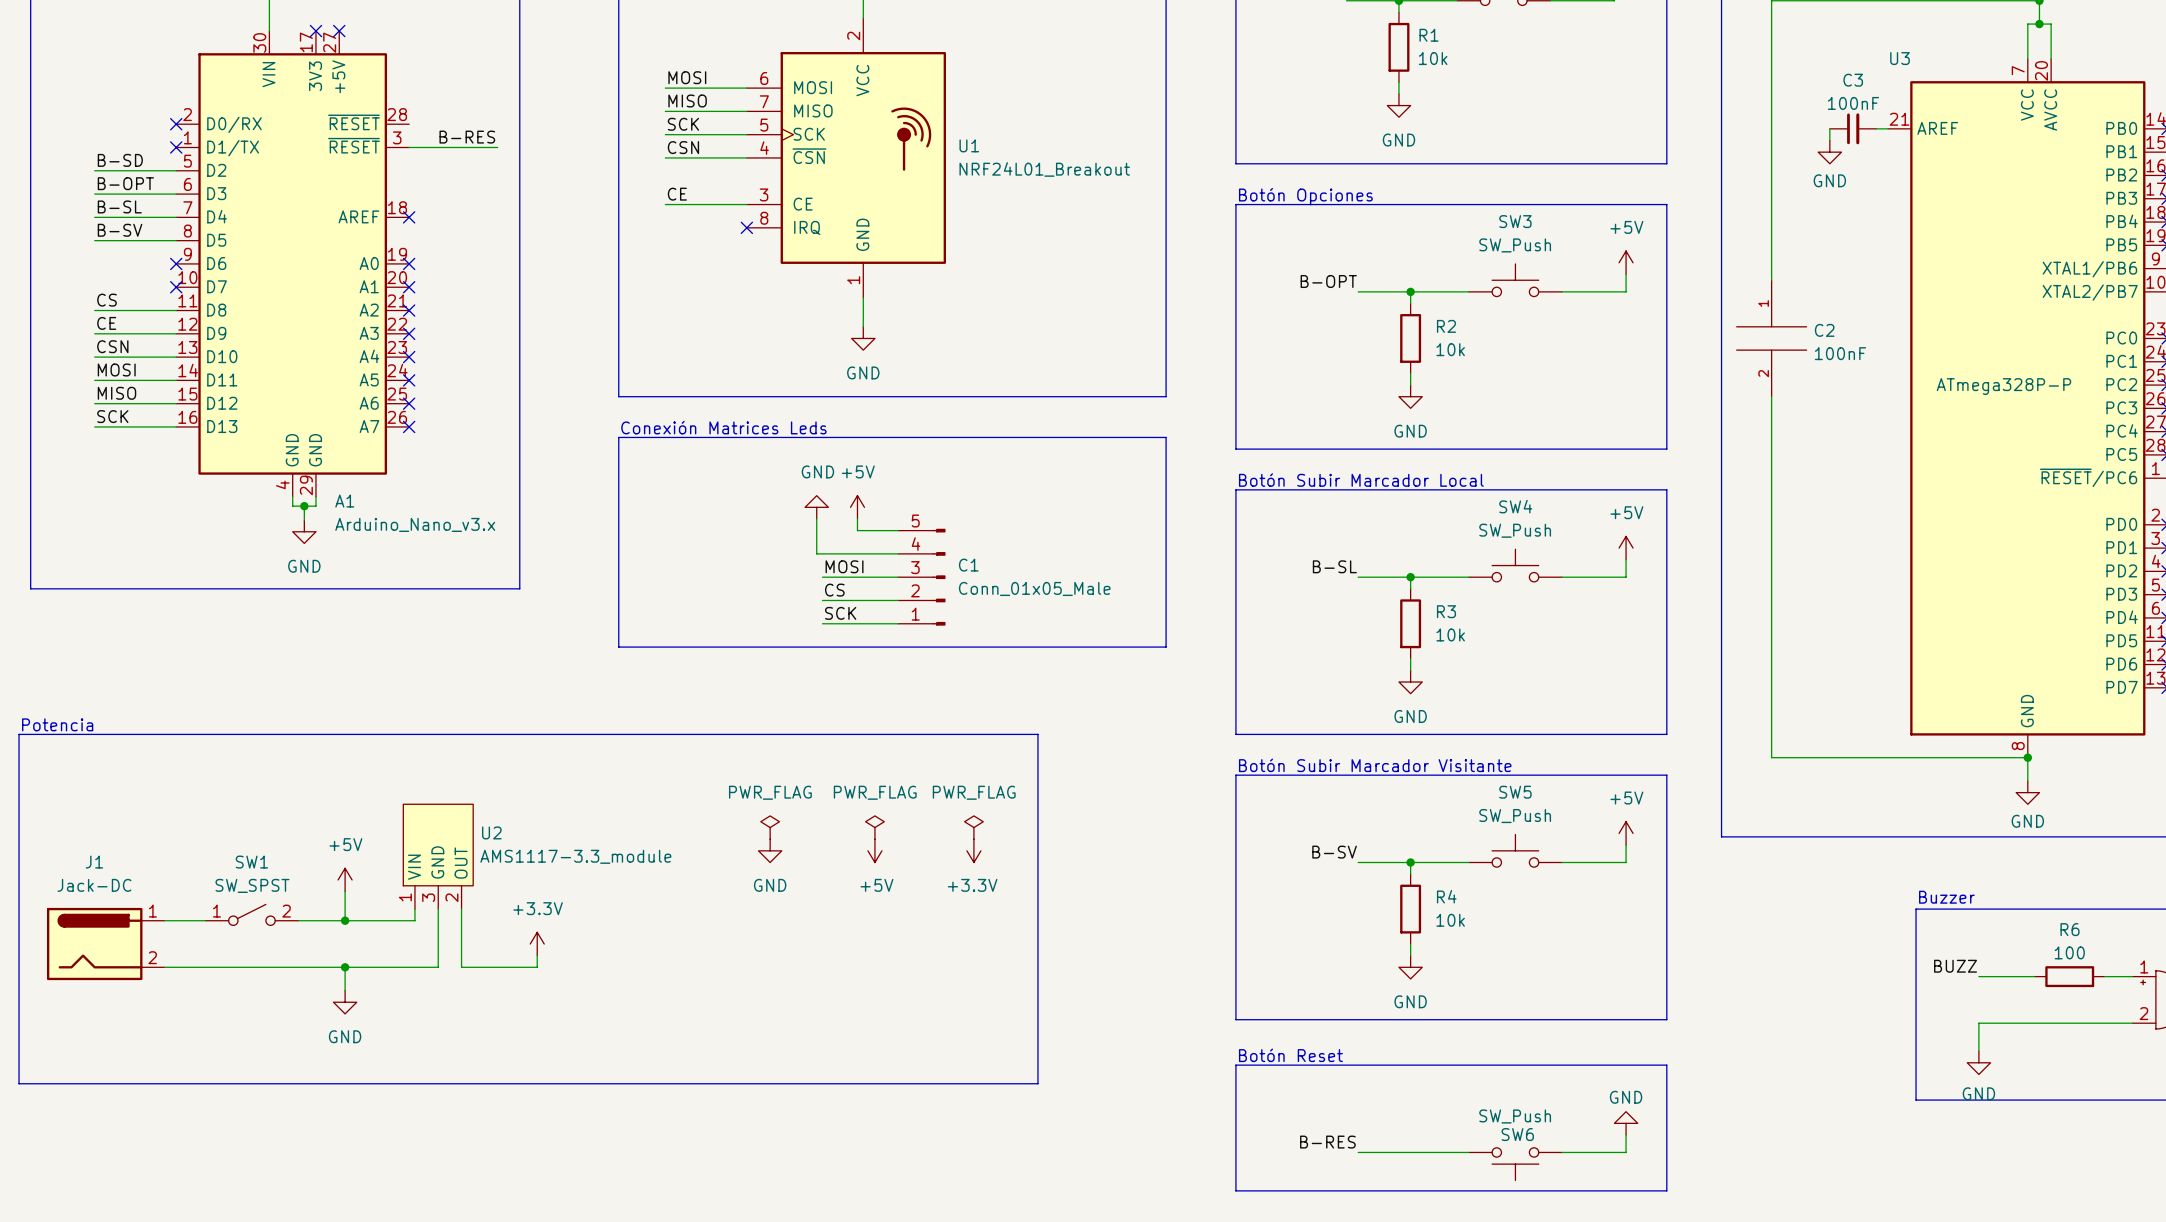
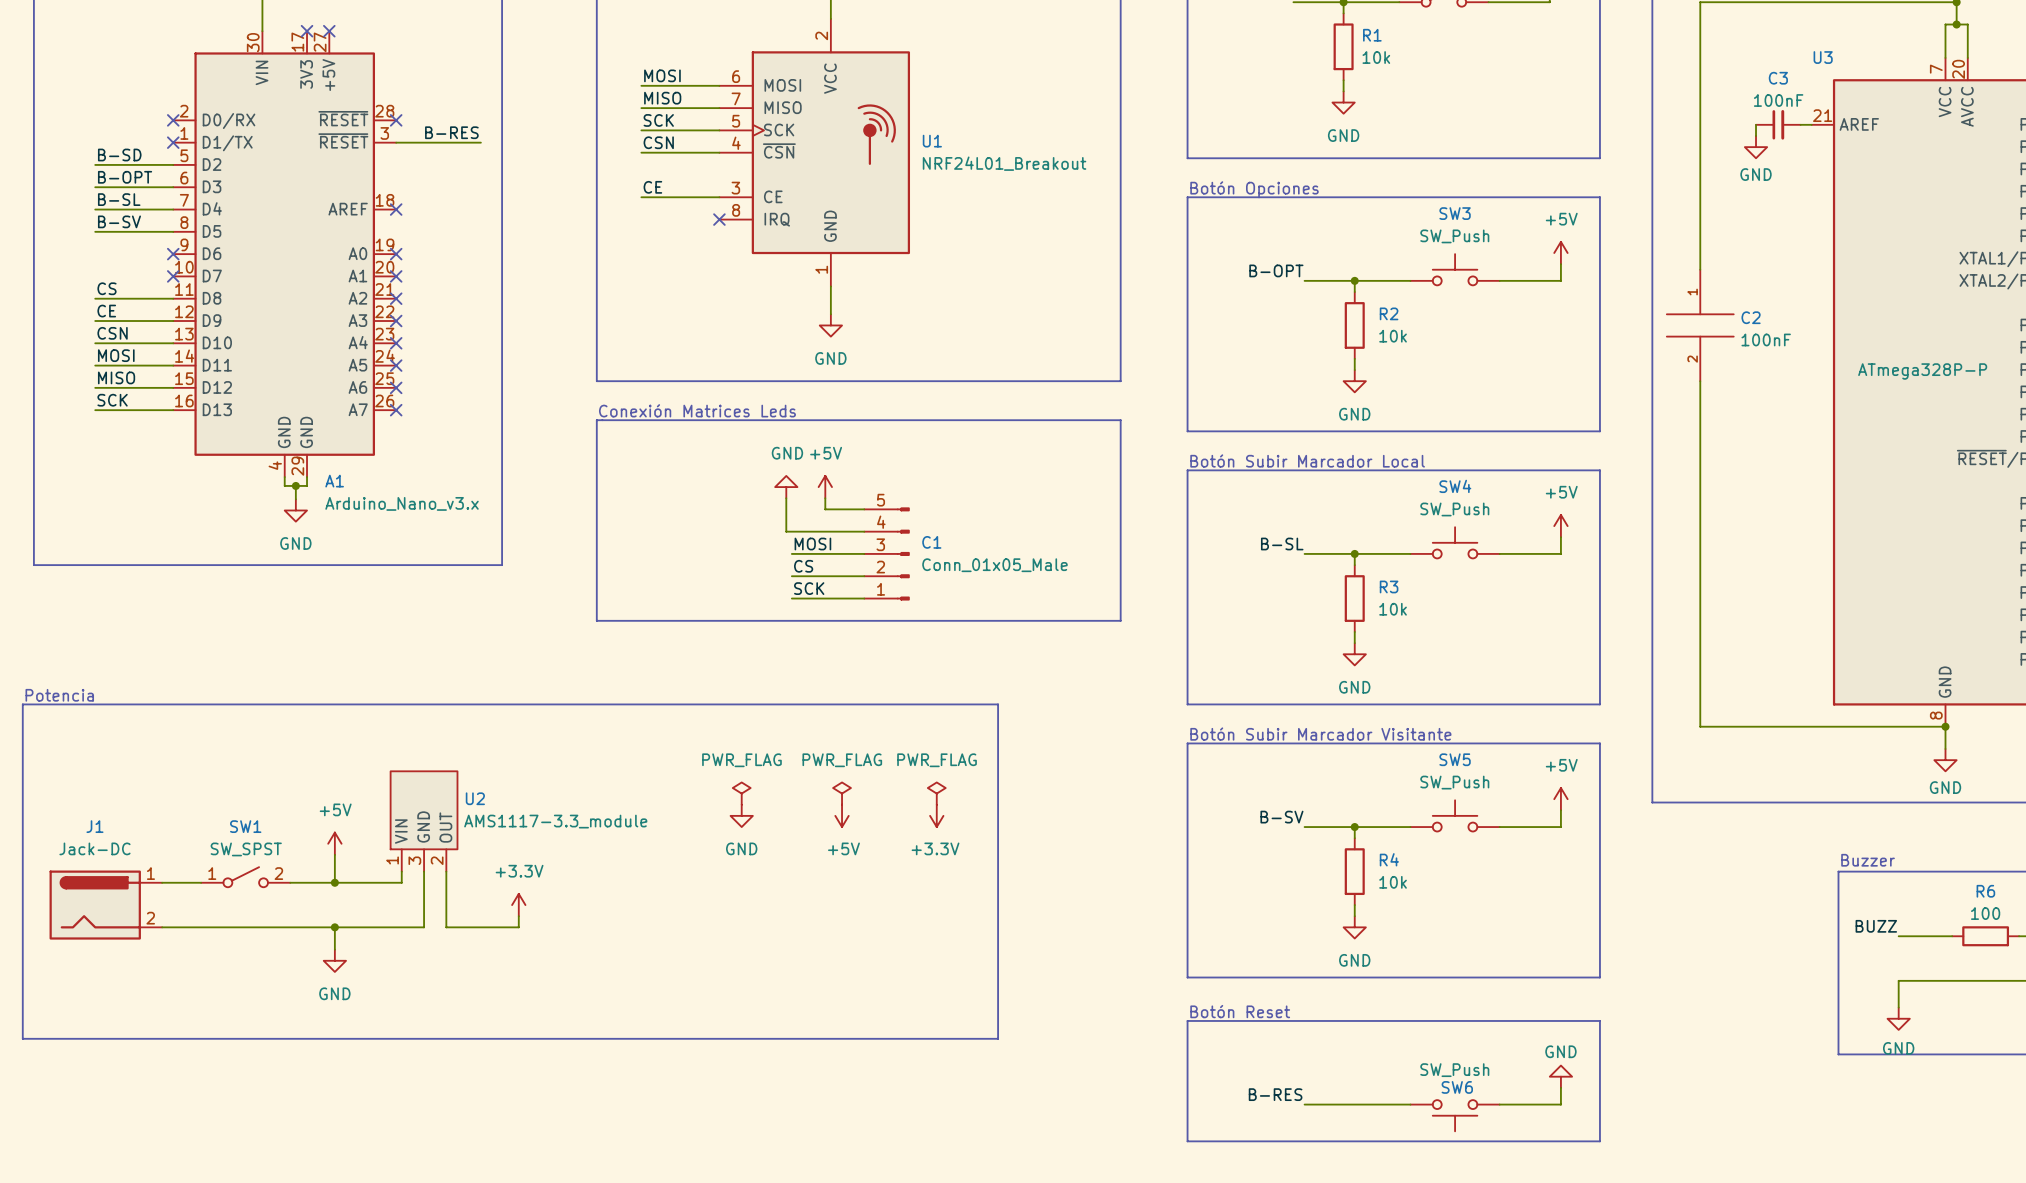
no-connect mark: none -> (396, 120)

